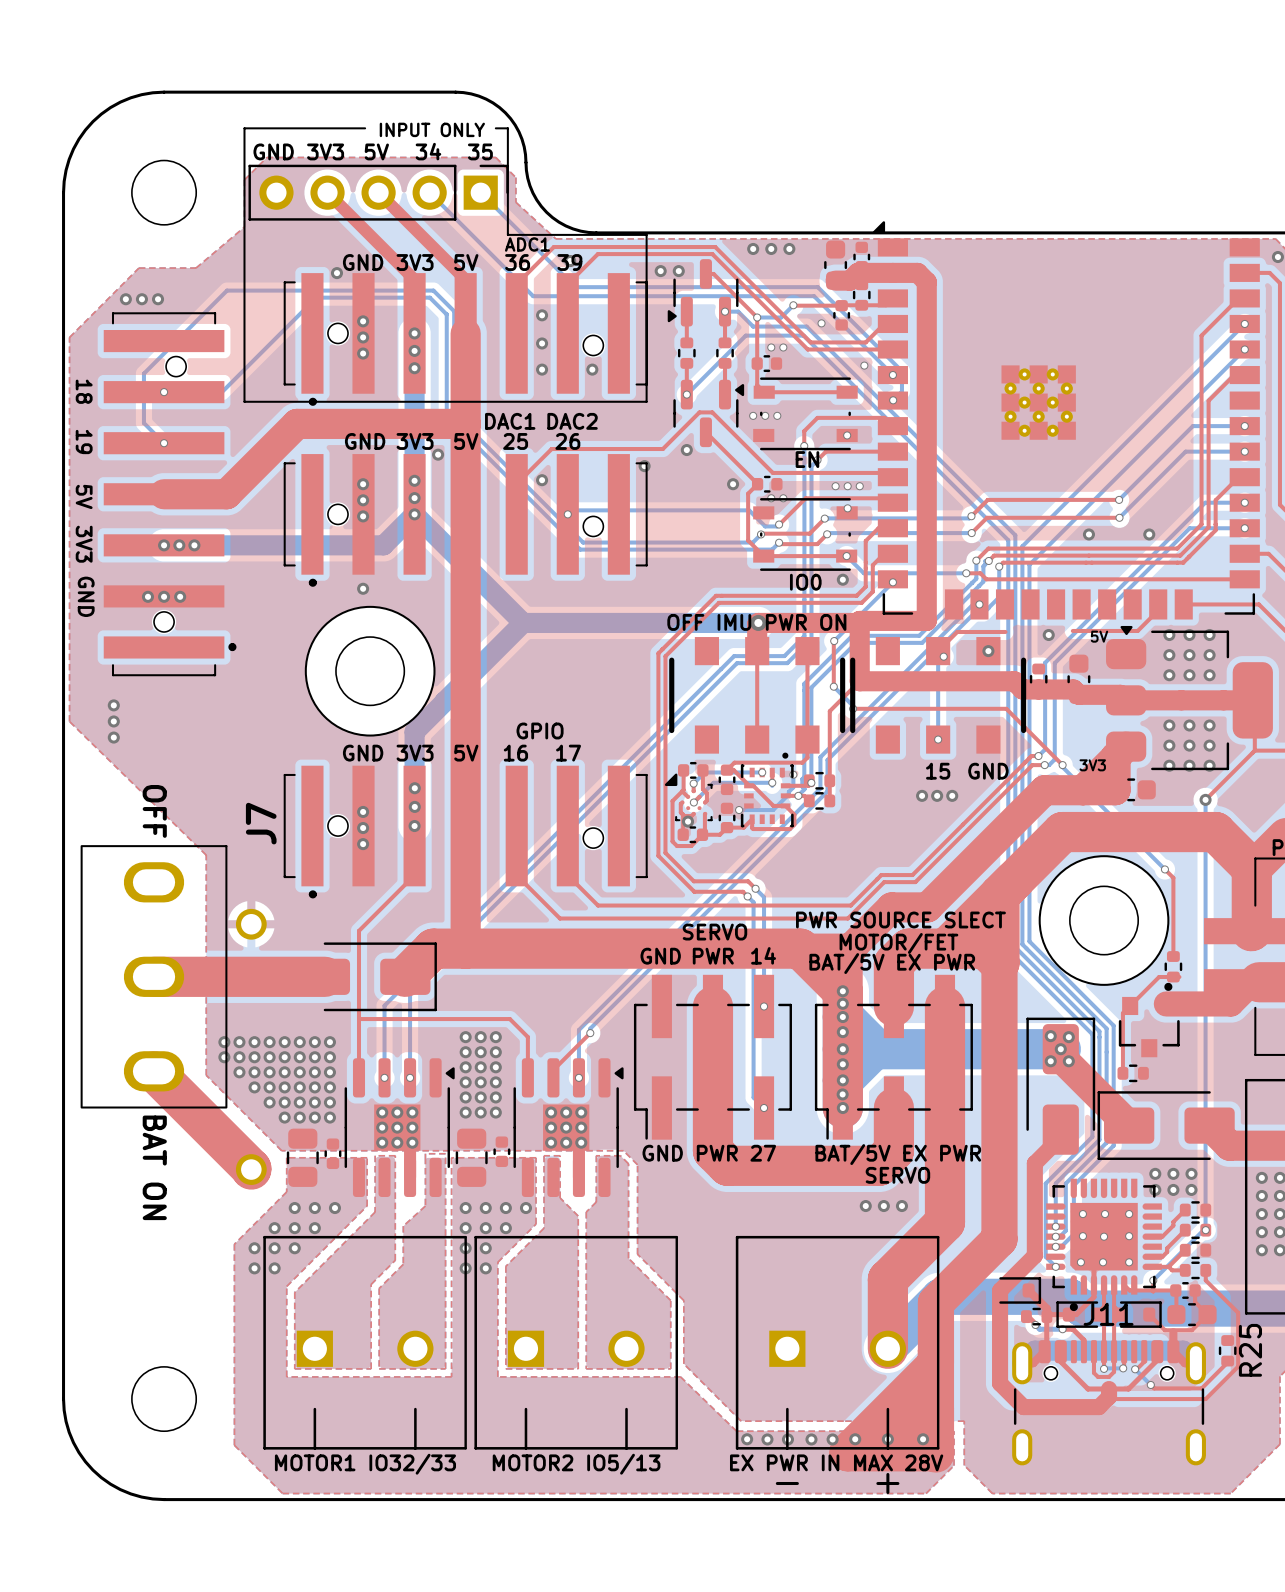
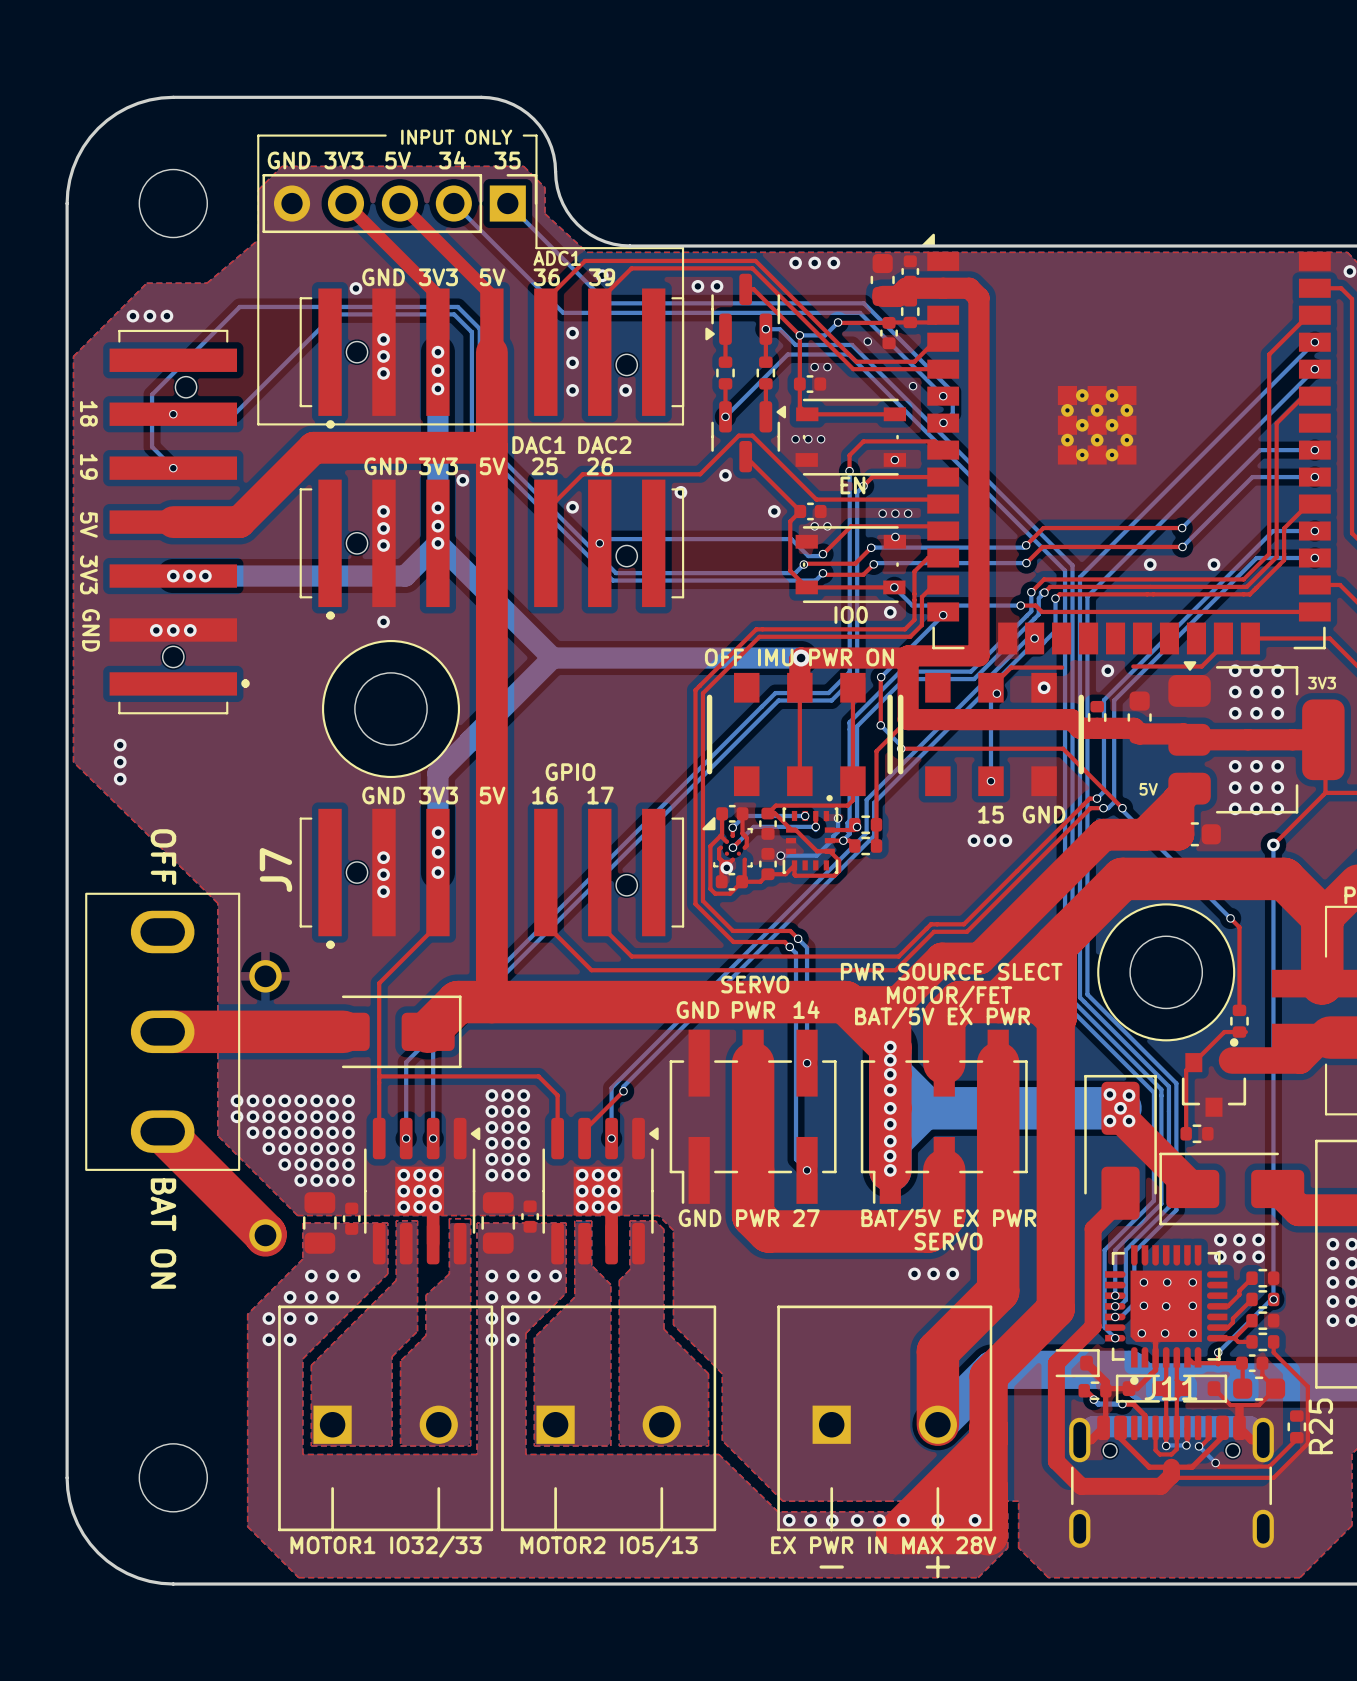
text: 5V (1099, 636) -> none
text: none -> 3V3 (1322, 683)
text: 3V3 (1092, 765) -> 5V (1148, 789)

